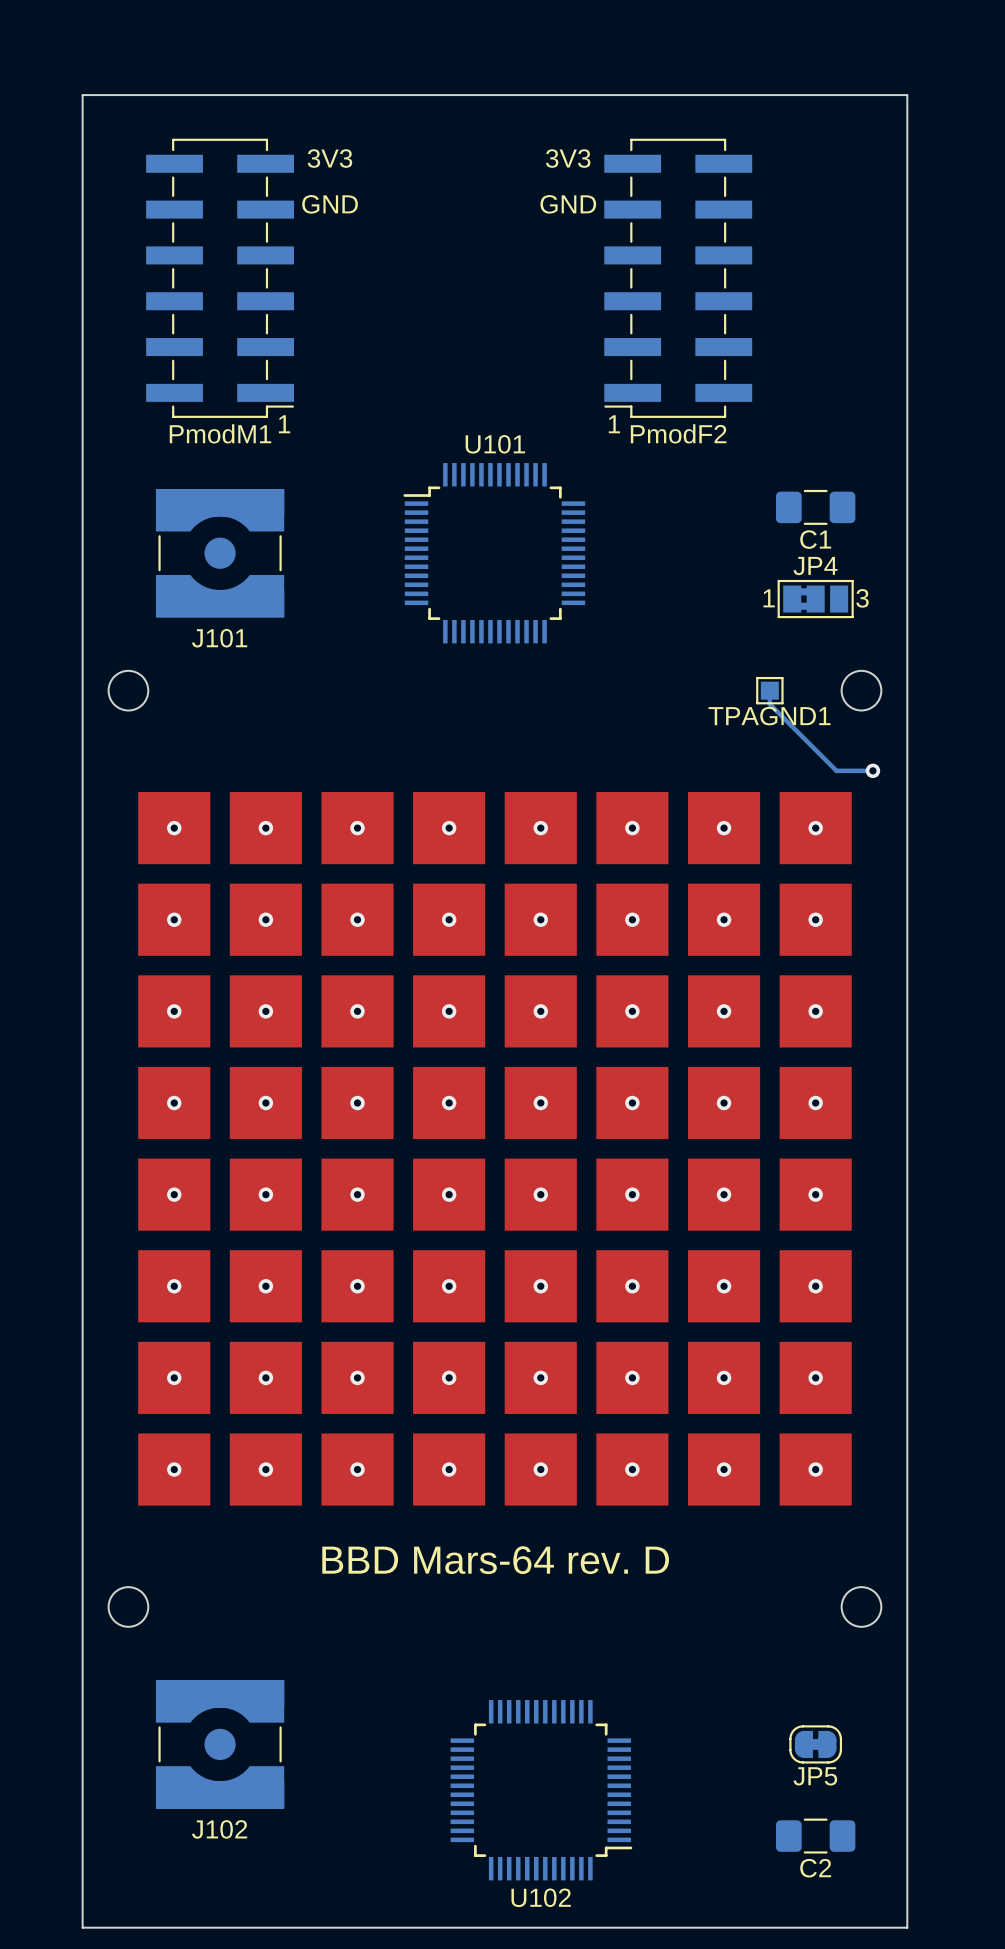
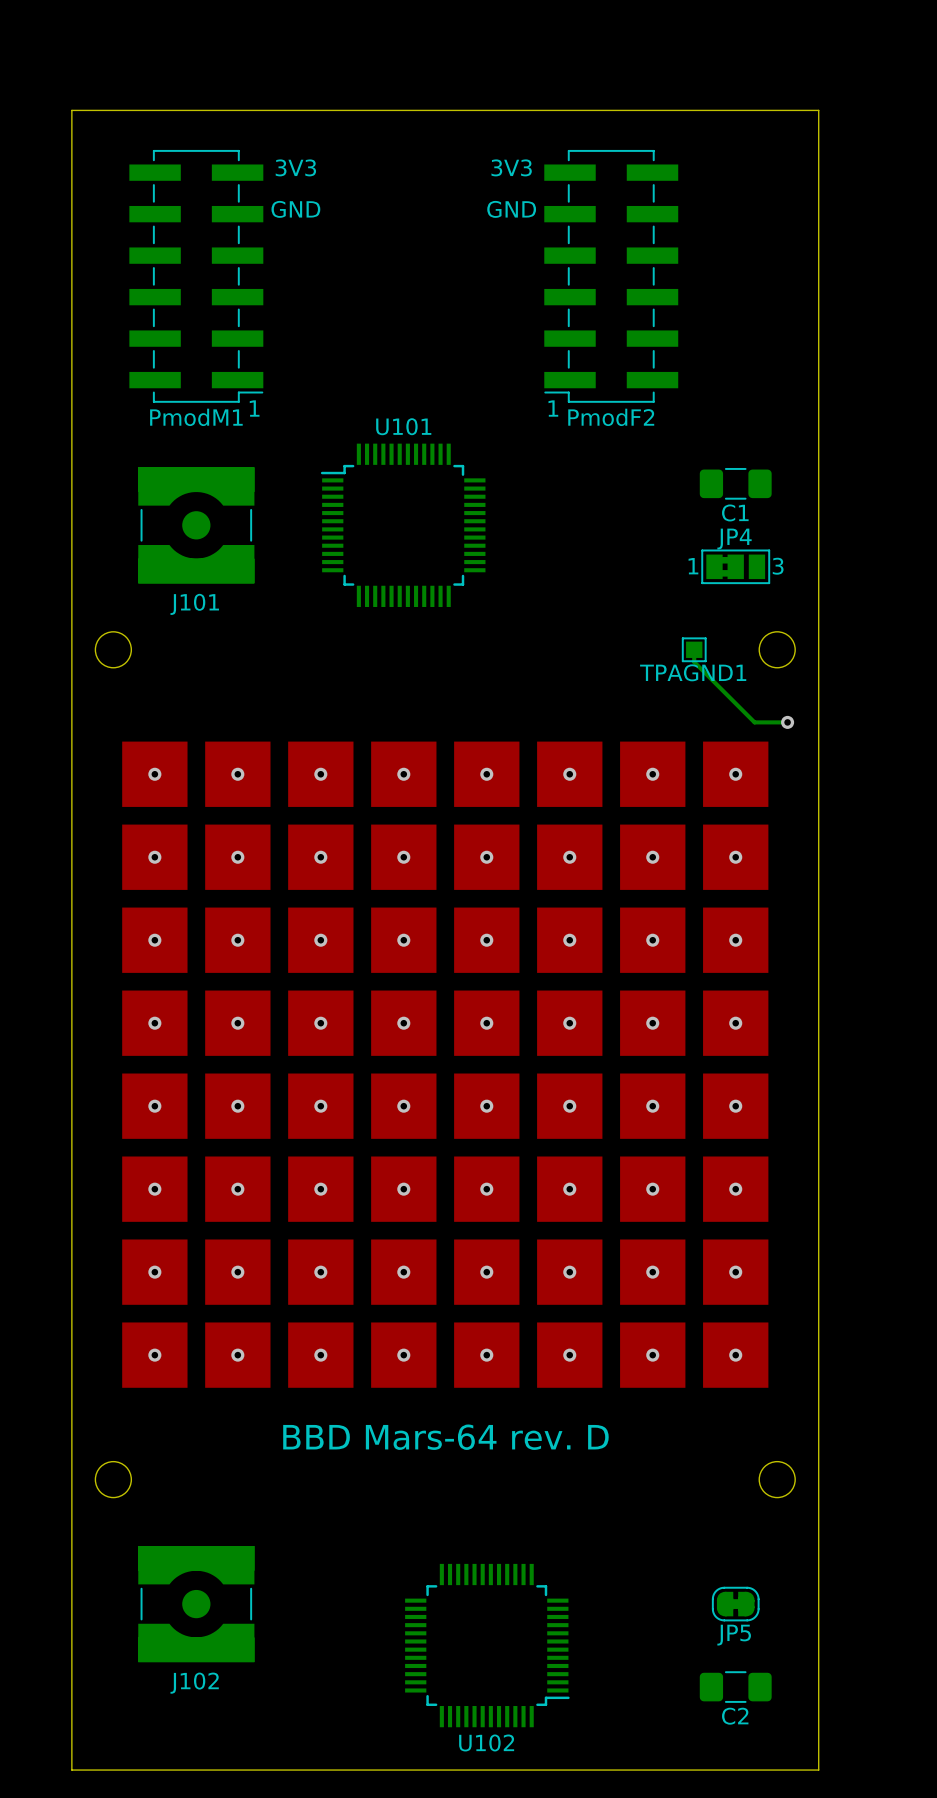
U101 position: (494, 553) -> (403, 525)

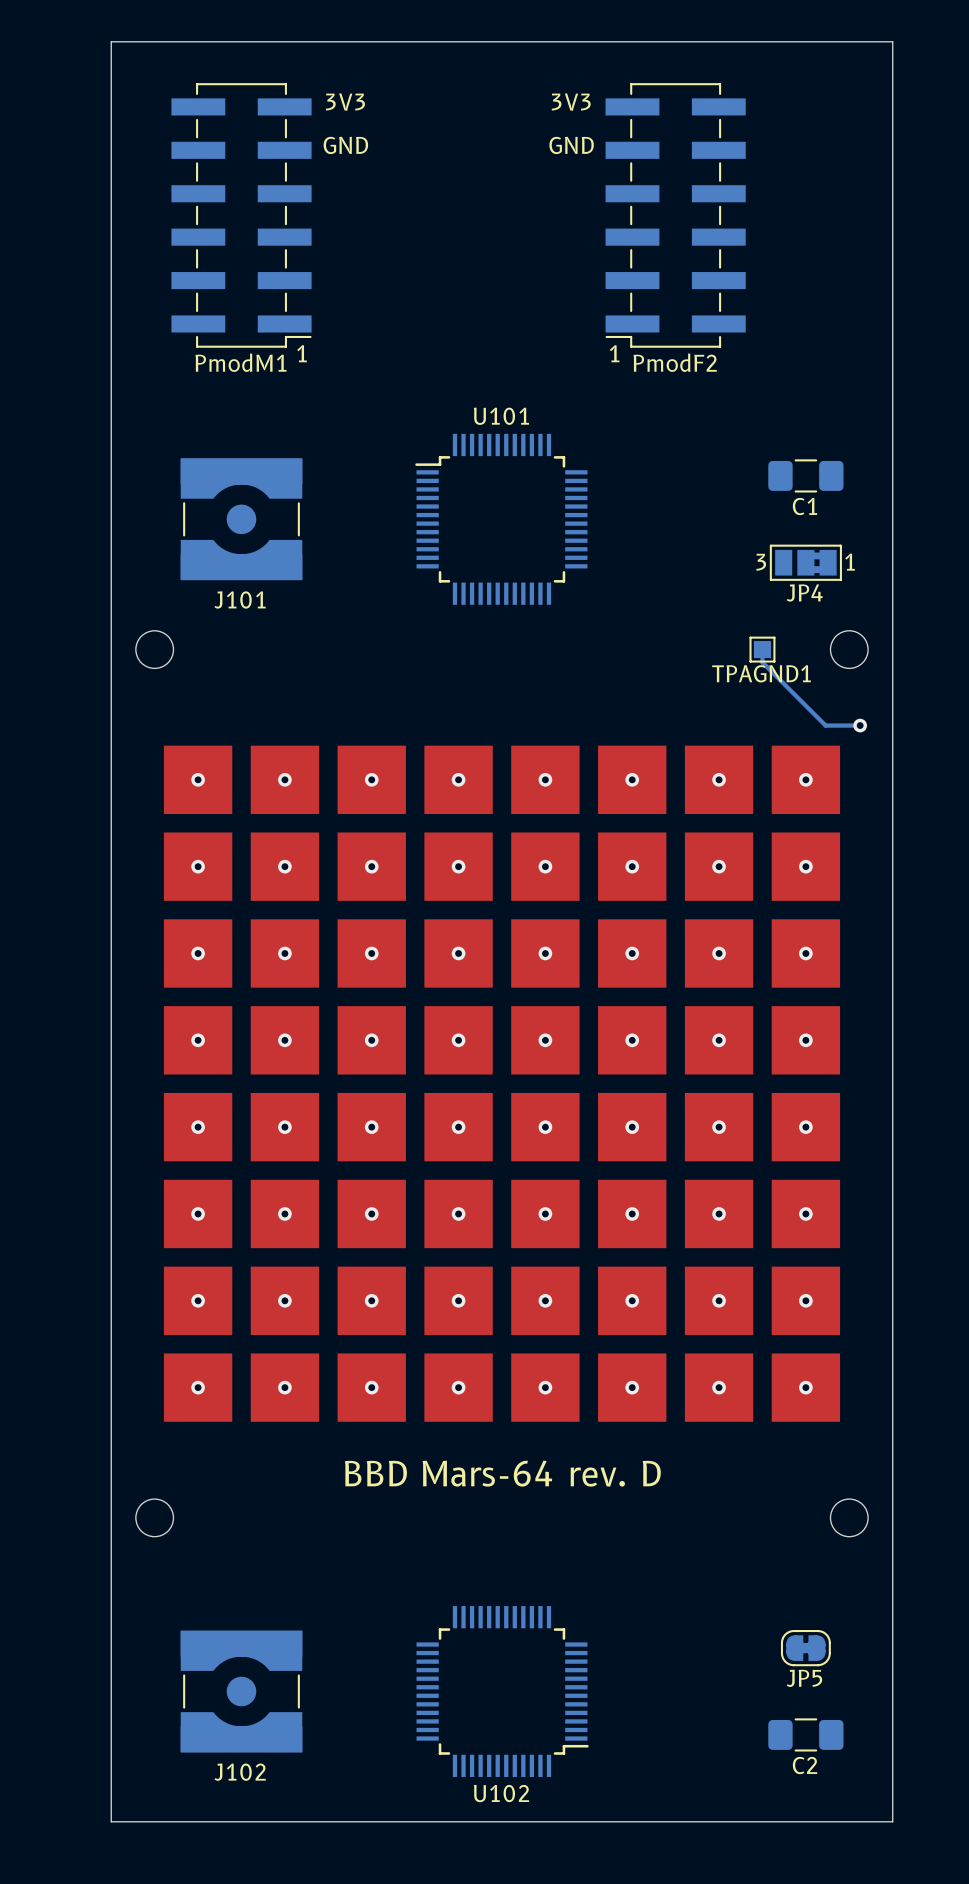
board edge: (818, 110) (71, 110) -> (892, 85) (892, 41) (111, 41) (111, 85)
PmodM1 position: (196, 276) -> (241, 215)
PmodF2 position: (611, 276) -> (675, 215)
U101 position: (403, 525) -> (501, 519)
JP4 rotation: 0° (735, 566) -> 180° (805, 562)
J102 position: (196, 1604) -> (241, 1691)
U102 position: (487, 1645) -> (502, 1691)

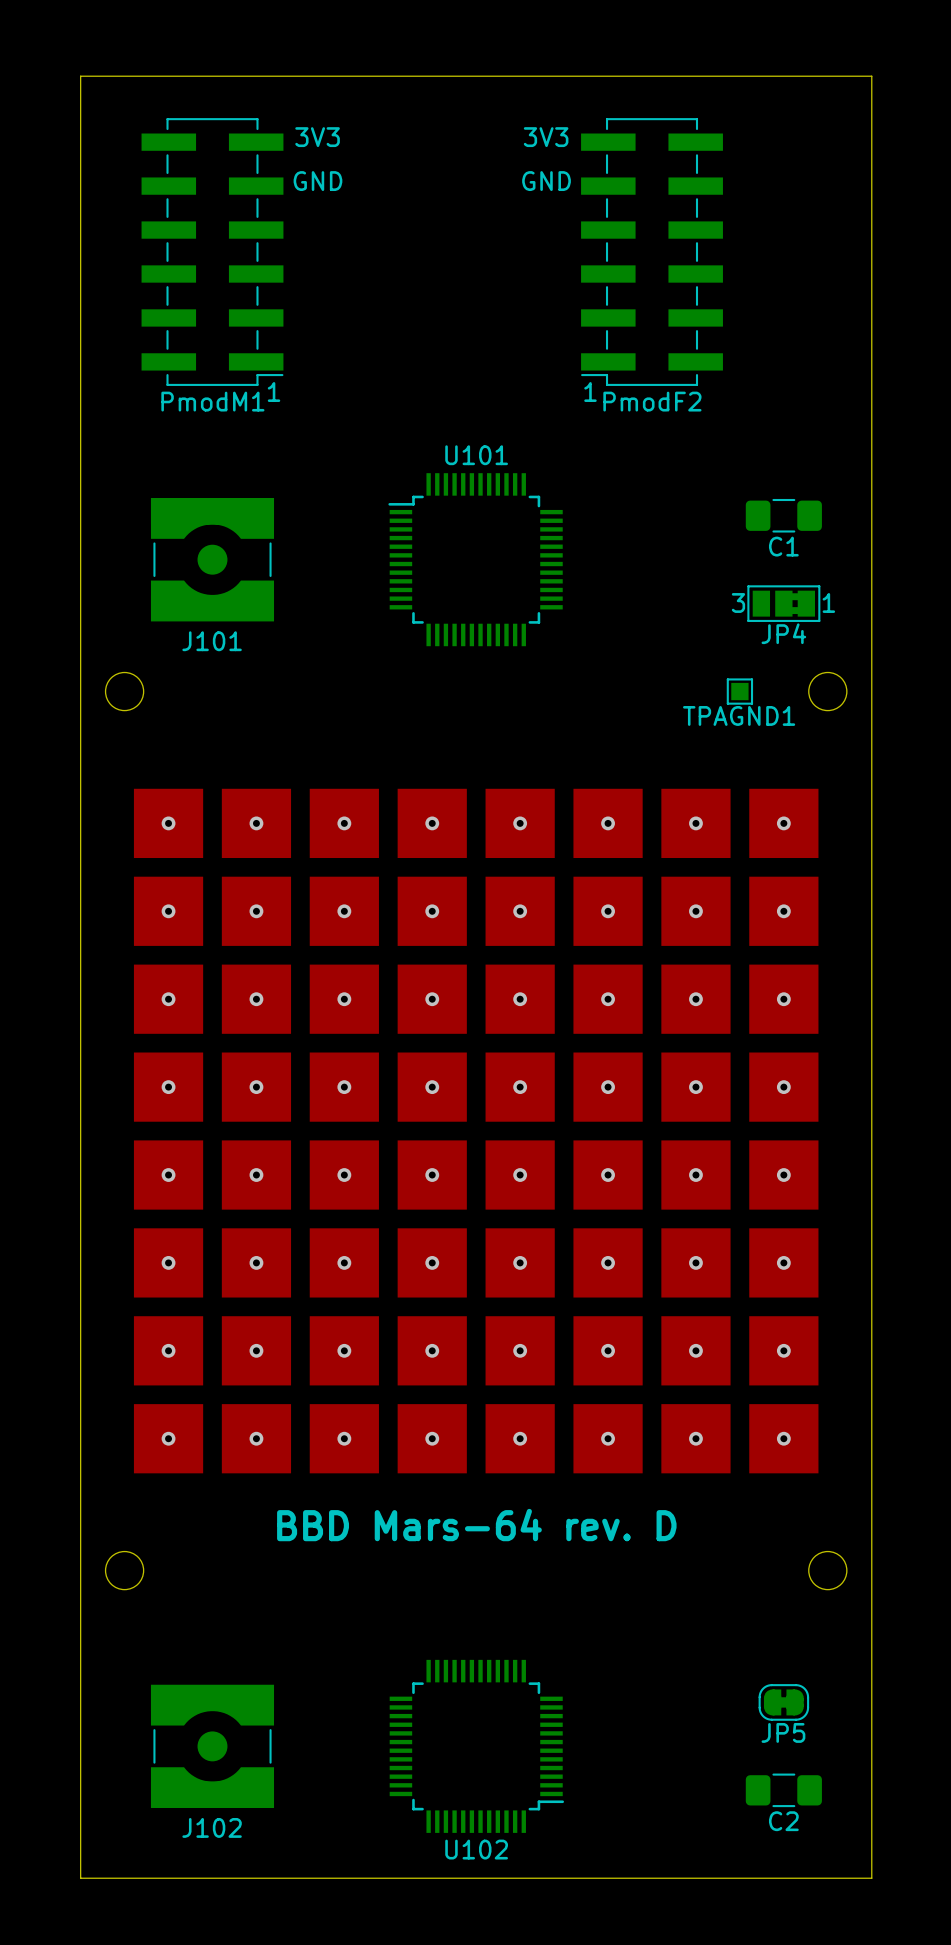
bottom track: (762, 649) (762, 662) (825, 725) (860, 725) -> none
via: (860, 725) -> none

